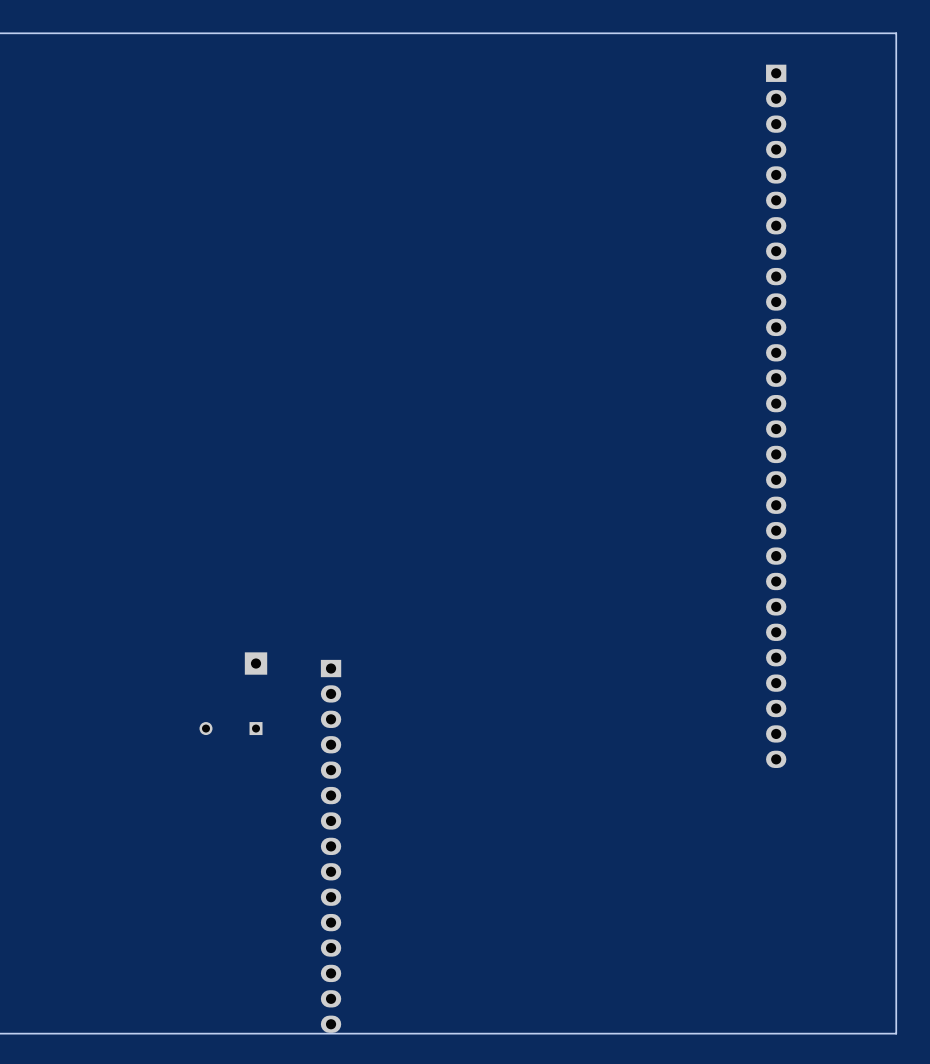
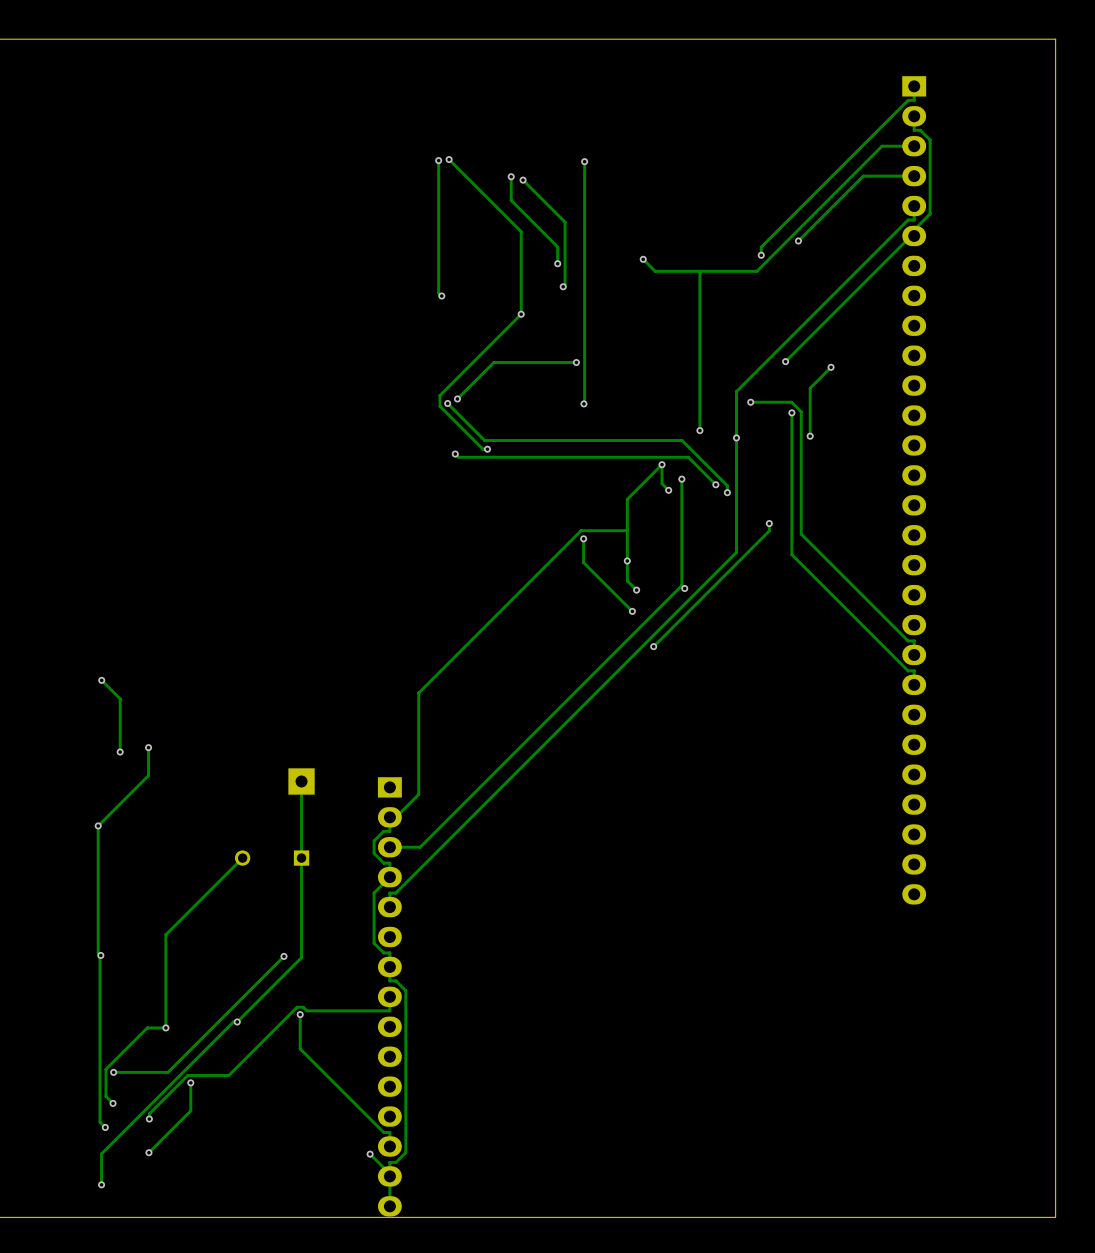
track: none -> (914, 86) (914, 100) (908, 100) (761, 247) (761, 255)
track: none -> (914, 116) (914, 130) (920, 130) (930, 140) (930, 214) (914, 229) (914, 235)
track: none -> (914, 146) (882, 146) (756, 271) (655, 271) (643, 259)
track: none -> (449, 159) (521, 231) (521, 314) (439, 395) (439, 406) (483, 449) (487, 449)
via: none -> (449, 159)
track: none -> (438, 160) (438, 292) (441, 296)
via: none -> (438, 160)
track: none -> (584, 161) (583, 403)
via: none -> (584, 161)
track: none -> (914, 176) (863, 176) (798, 240)
track: none -> (511, 176) (511, 200) (557, 246) (557, 263)
via: none -> (511, 176)
track: none -> (523, 180) (565, 222) (565, 284) (563, 286)
via: none -> (523, 180)
track: none -> (914, 206) (914, 220) (908, 220) (736, 391) (736, 552) (395, 893) (389, 893) (389, 907)
track: none -> (914, 232) (785, 361)
via: none -> (798, 240)
via: none -> (761, 255)
via: none -> (643, 259)
via: none -> (557, 263)
track: none -> (699, 271) (699, 430)
via: none -> (563, 286)
via: none -> (441, 296)
via: none -> (521, 314)
track: none -> (576, 362) (493, 362) (457, 398)
via: none -> (576, 362)
via: none -> (785, 361)
track: none -> (831, 367) (810, 388) (810, 436)
via: none -> (831, 367)
via: none -> (457, 398)
track: none -> (750, 402) (791, 402) (801, 411) (801, 534) (908, 640) (914, 640) (914, 654)
via: none -> (750, 402)
track: none -> (447, 403) (484, 440) (682, 440) (727, 485) (727, 492)
via: none -> (447, 403)
via: none -> (583, 403)
track: none -> (791, 412) (791, 554) (908, 670) (914, 670) (914, 684)
via: none -> (791, 412)
via: none -> (699, 430)
via: none -> (810, 436)
via: none -> (736, 437)
via: none -> (487, 449)
track: none -> (455, 454) (458, 457) (688, 457) (715, 484)
via: none -> (455, 454)
via: none -> (662, 464)
track: none -> (681, 479) (681, 585)
via: none -> (681, 479)
via: none -> (715, 484)
track: none -> (668, 490) (662, 483) (662, 464) (627, 499) (627, 580) (636, 590)
via: none -> (668, 490)
via: none -> (727, 492)
track: none -> (769, 523) (769, 530) (653, 646)
via: none -> (769, 523)
track: none -> (627, 530) (581, 530) (418, 693) (418, 794) (389, 823)
track: none -> (583, 538) (583, 562) (632, 611)
via: none -> (583, 538)
via: none -> (627, 560)
track: none -> (681, 585) (420, 847) (389, 847)
via: none -> (684, 588)
via: none -> (636, 590)
via: none -> (632, 611)
via: none -> (653, 646)
track: none -> (101, 680) (120, 698) (120, 752)
via: none -> (101, 680)
track: none -> (148, 747) (148, 775) (98, 825) (98, 952) (100, 955) (100, 1122) (105, 1127)
via: none -> (148, 747)
via: none -> (120, 752)
track: none -> (301, 781) (301, 957) (237, 1021) (233, 1021) (101, 1153) (101, 1184)
track: none -> (389, 817) (389, 831) (383, 831) (374, 841) (374, 853) (383, 863) (389, 863) (389, 877) (374, 892) (374, 943) (383, 952) (389, 952) (389, 980) (396, 980) (405, 990) (405, 1152) (396, 1162) (389, 1162) (389, 1206)
via: none -> (98, 825)
track: none -> (242, 858) (165, 934) (165, 1027) (147, 1027) (105, 1069) (105, 1096) (113, 1103)
via: none -> (100, 955)
track: none -> (284, 956) (168, 1072) (113, 1072)
via: none -> (284, 956)
track: none -> (389, 996) (389, 1010) (306, 1010) (303, 1007) (297, 1007) (228, 1075) (187, 1075) (149, 1113) (149, 1119)
track: none -> (300, 1014) (300, 1048) (383, 1132) (389, 1132) (389, 1146)
via: none -> (300, 1014)
via: none -> (237, 1021)
via: none -> (165, 1027)
via: none -> (113, 1072)
track: none -> (190, 1082) (190, 1110) (148, 1152)
via: none -> (190, 1082)
via: none -> (113, 1103)
via: none -> (149, 1119)
via: none -> (105, 1127)
via: none -> (148, 1152)
track: none -> (370, 1154) (385, 1169) (389, 1169)
via: none -> (370, 1154)
via: none -> (101, 1184)

